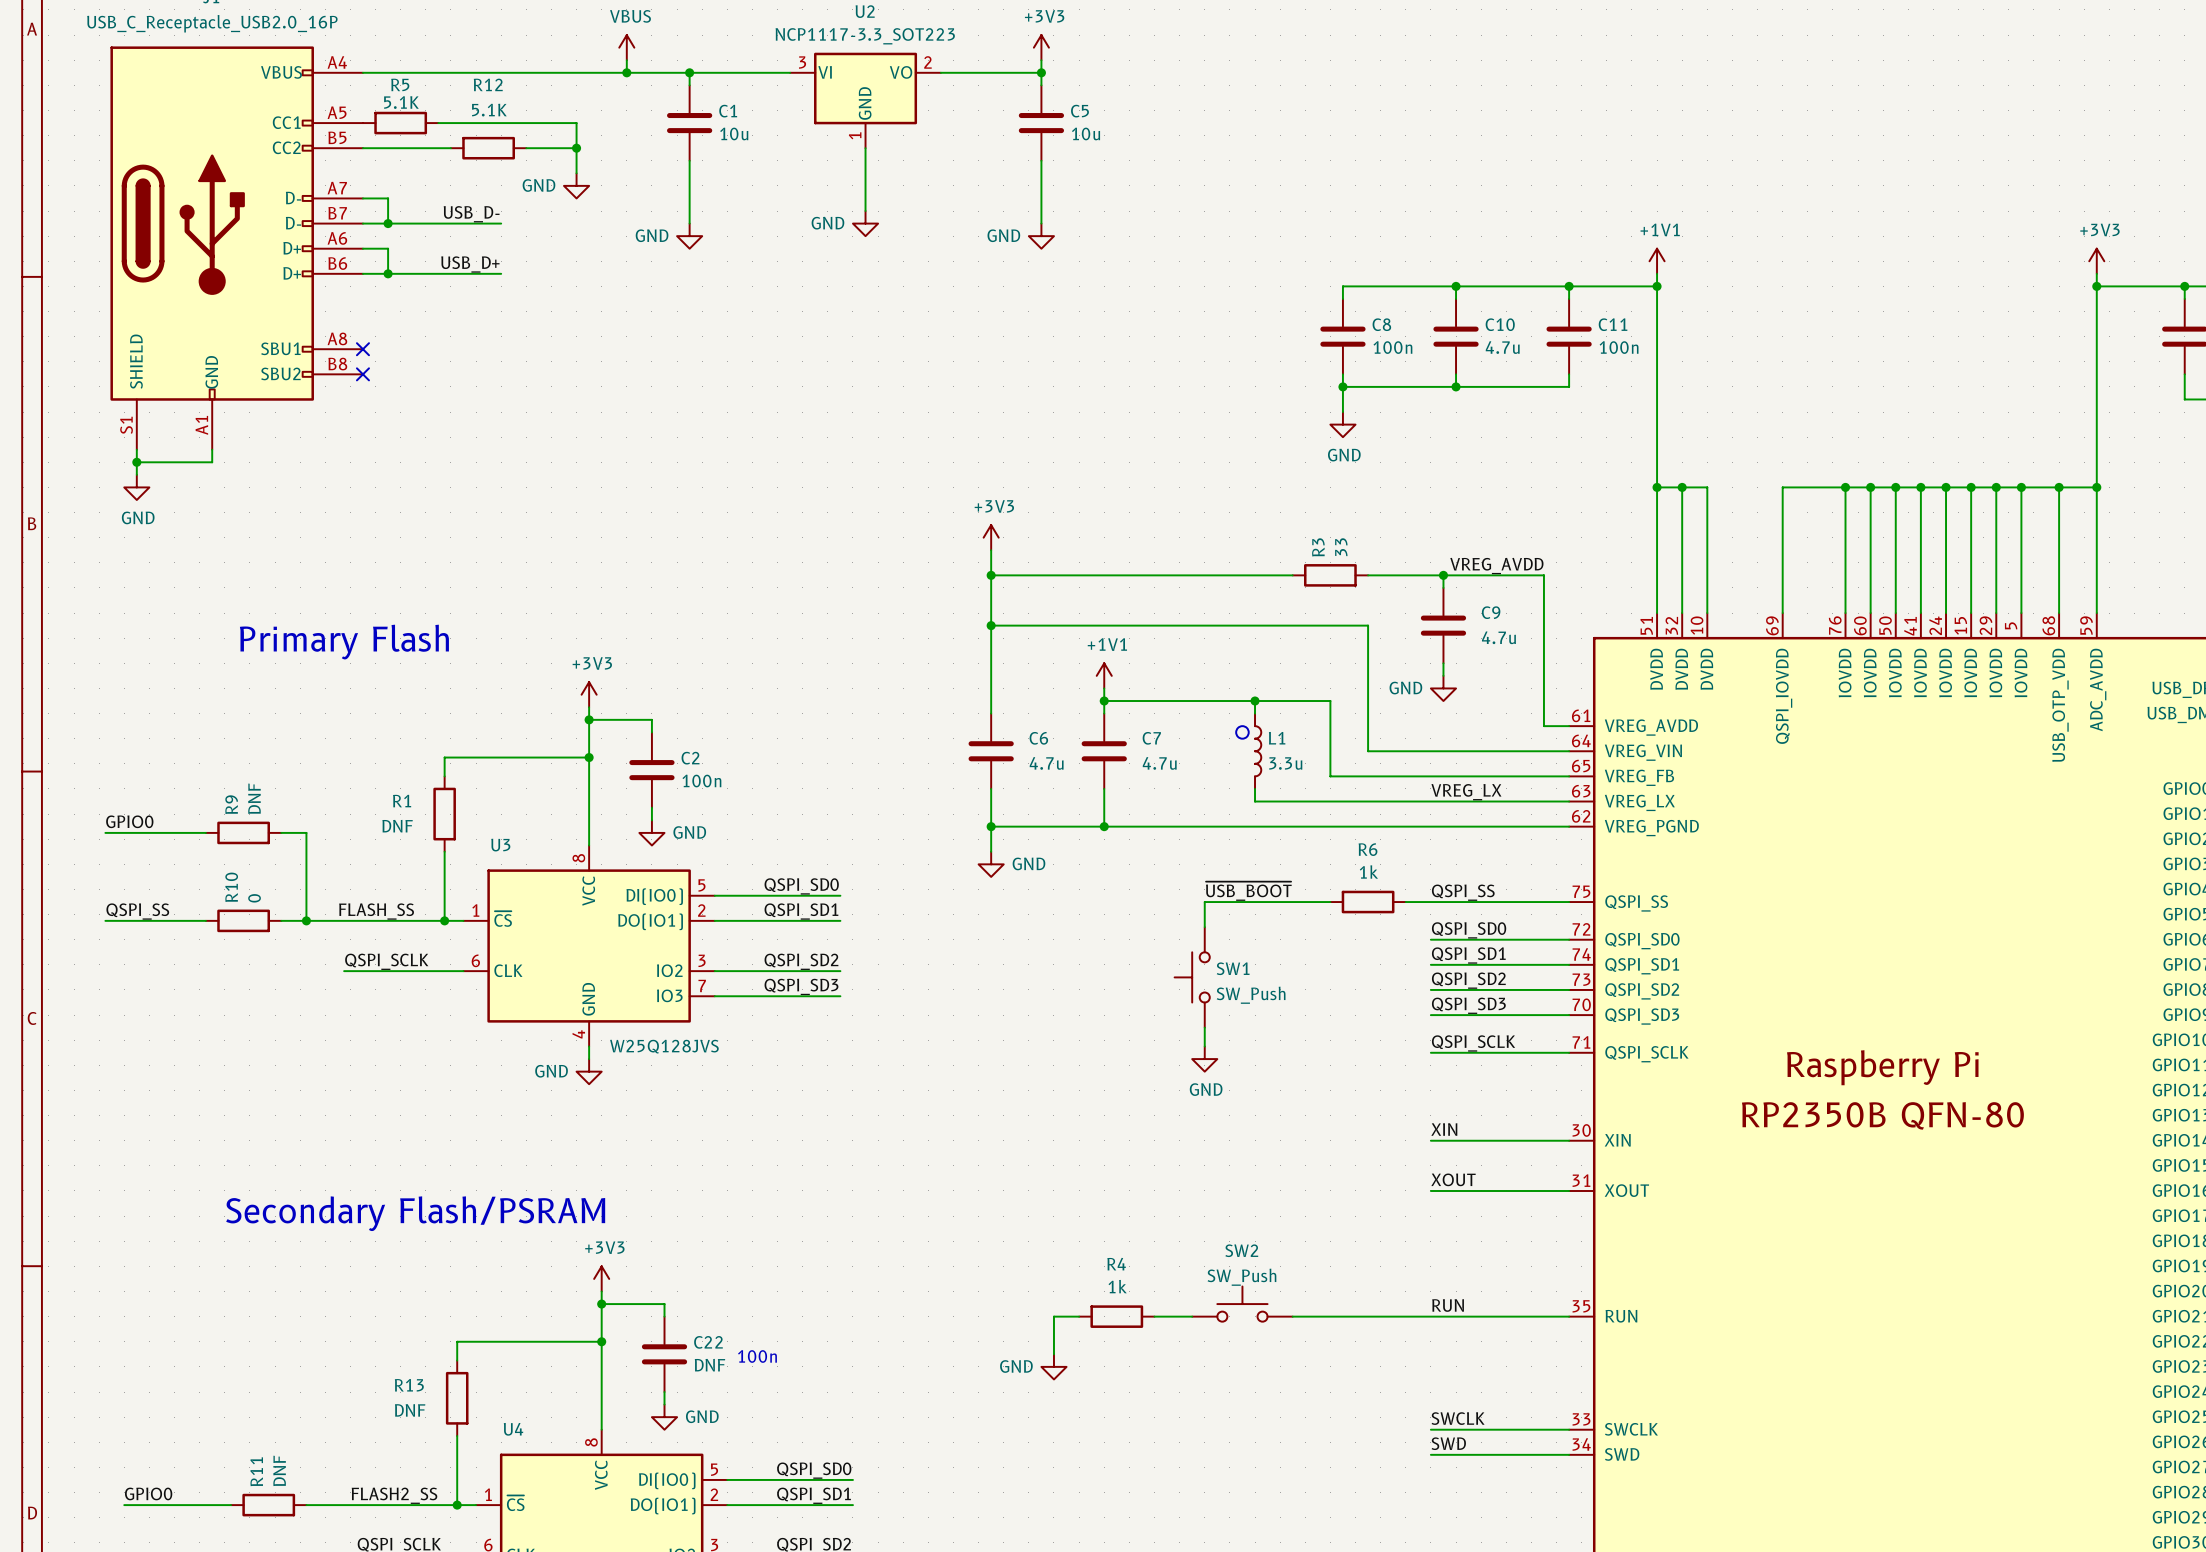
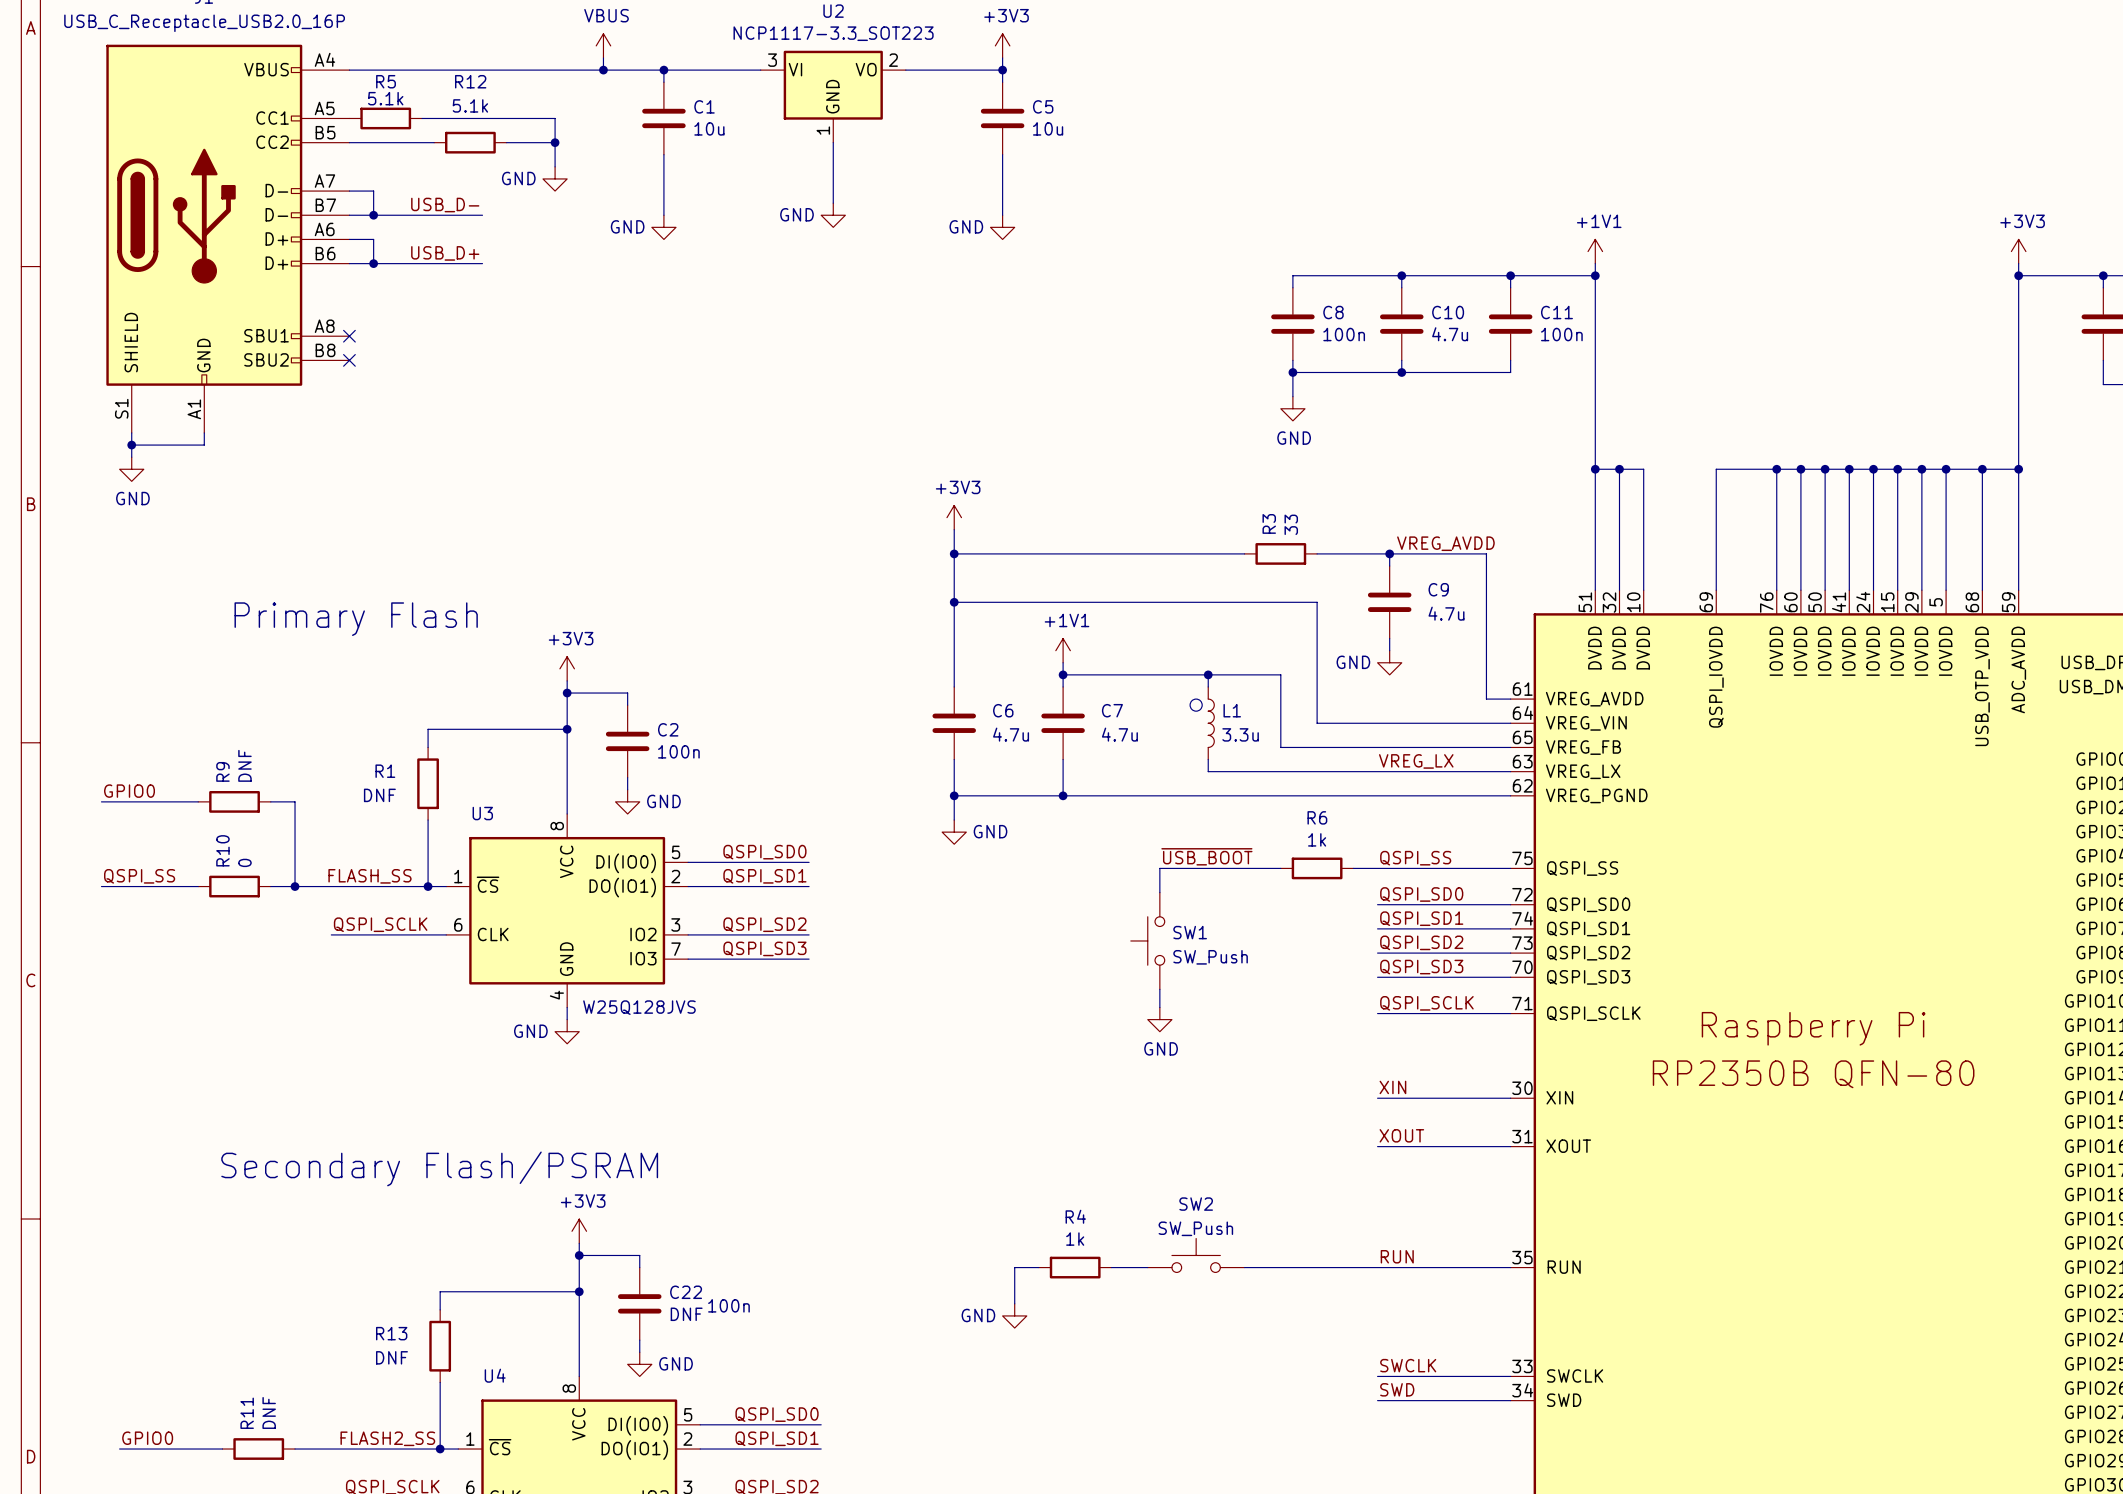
R5 value: 5.1K (401, 102) -> 5.1k (385, 98)
R12 value: 5.1K (489, 110) -> 5.1k (470, 105)

